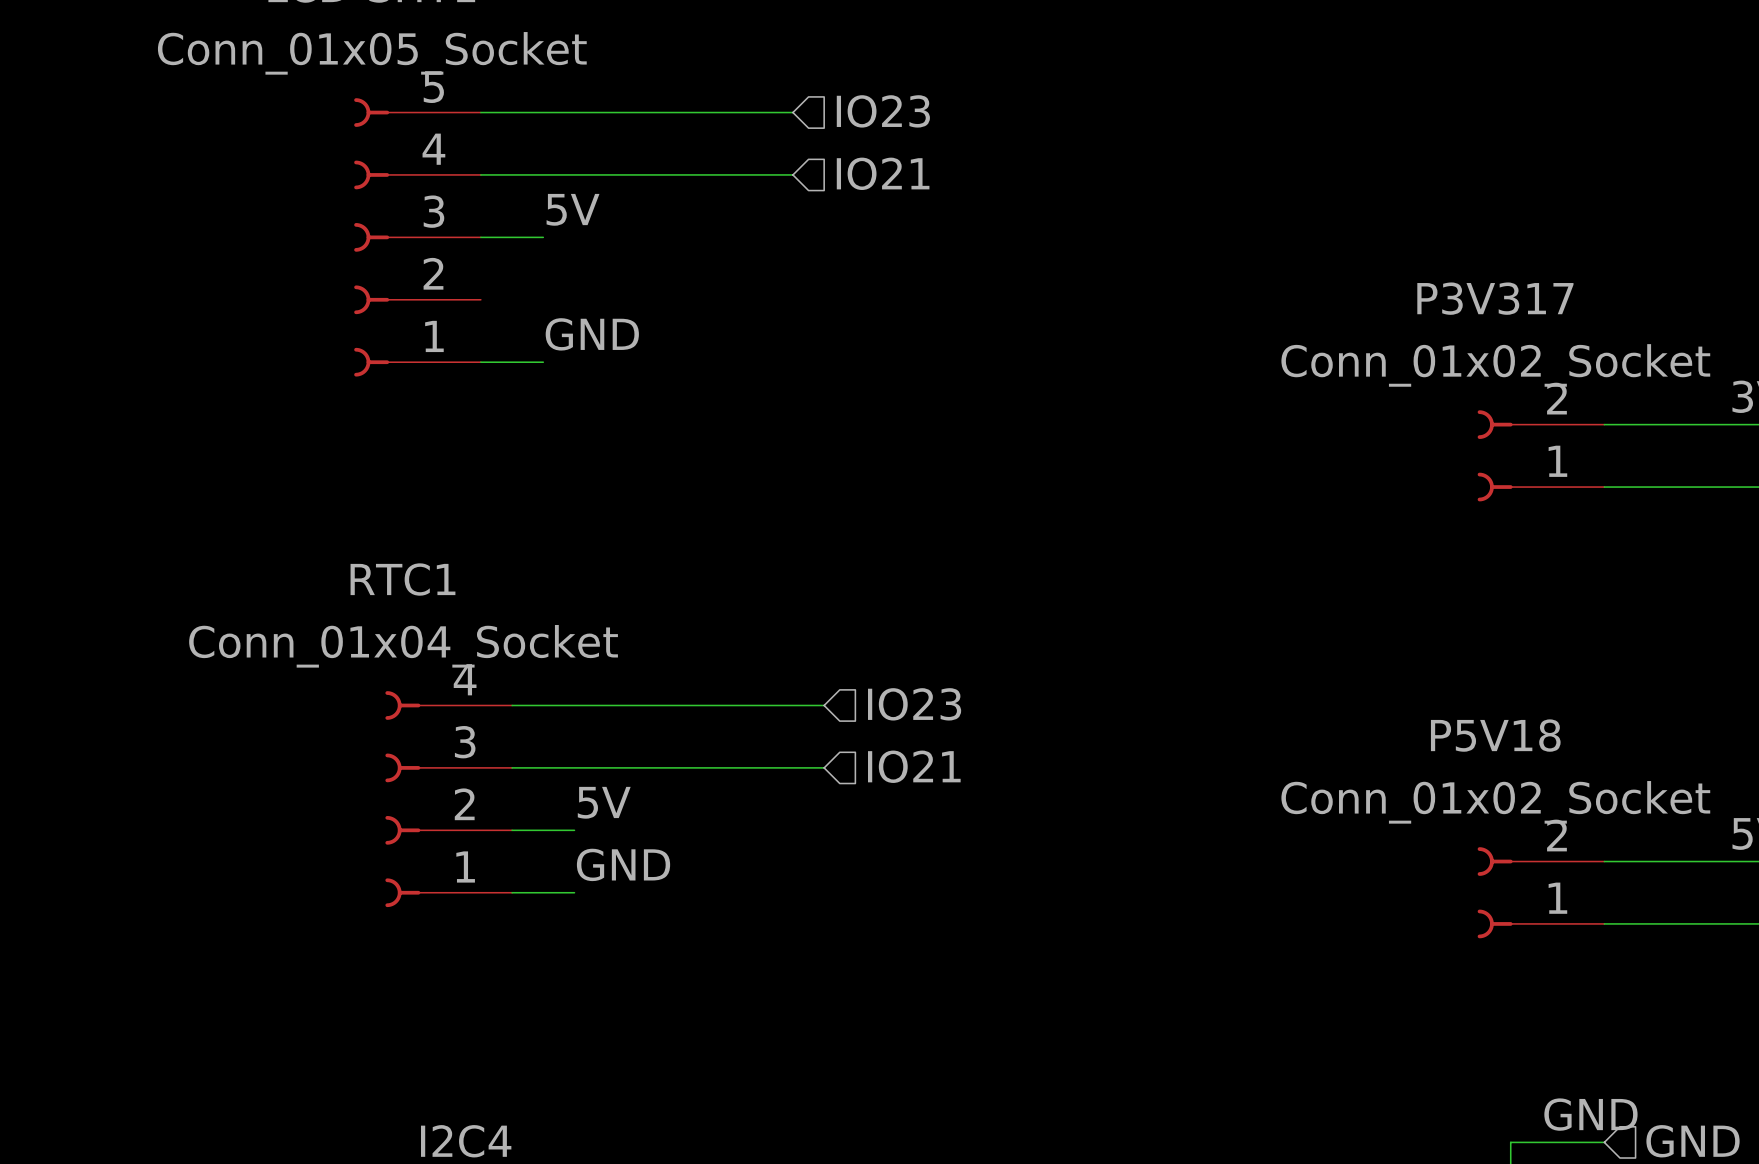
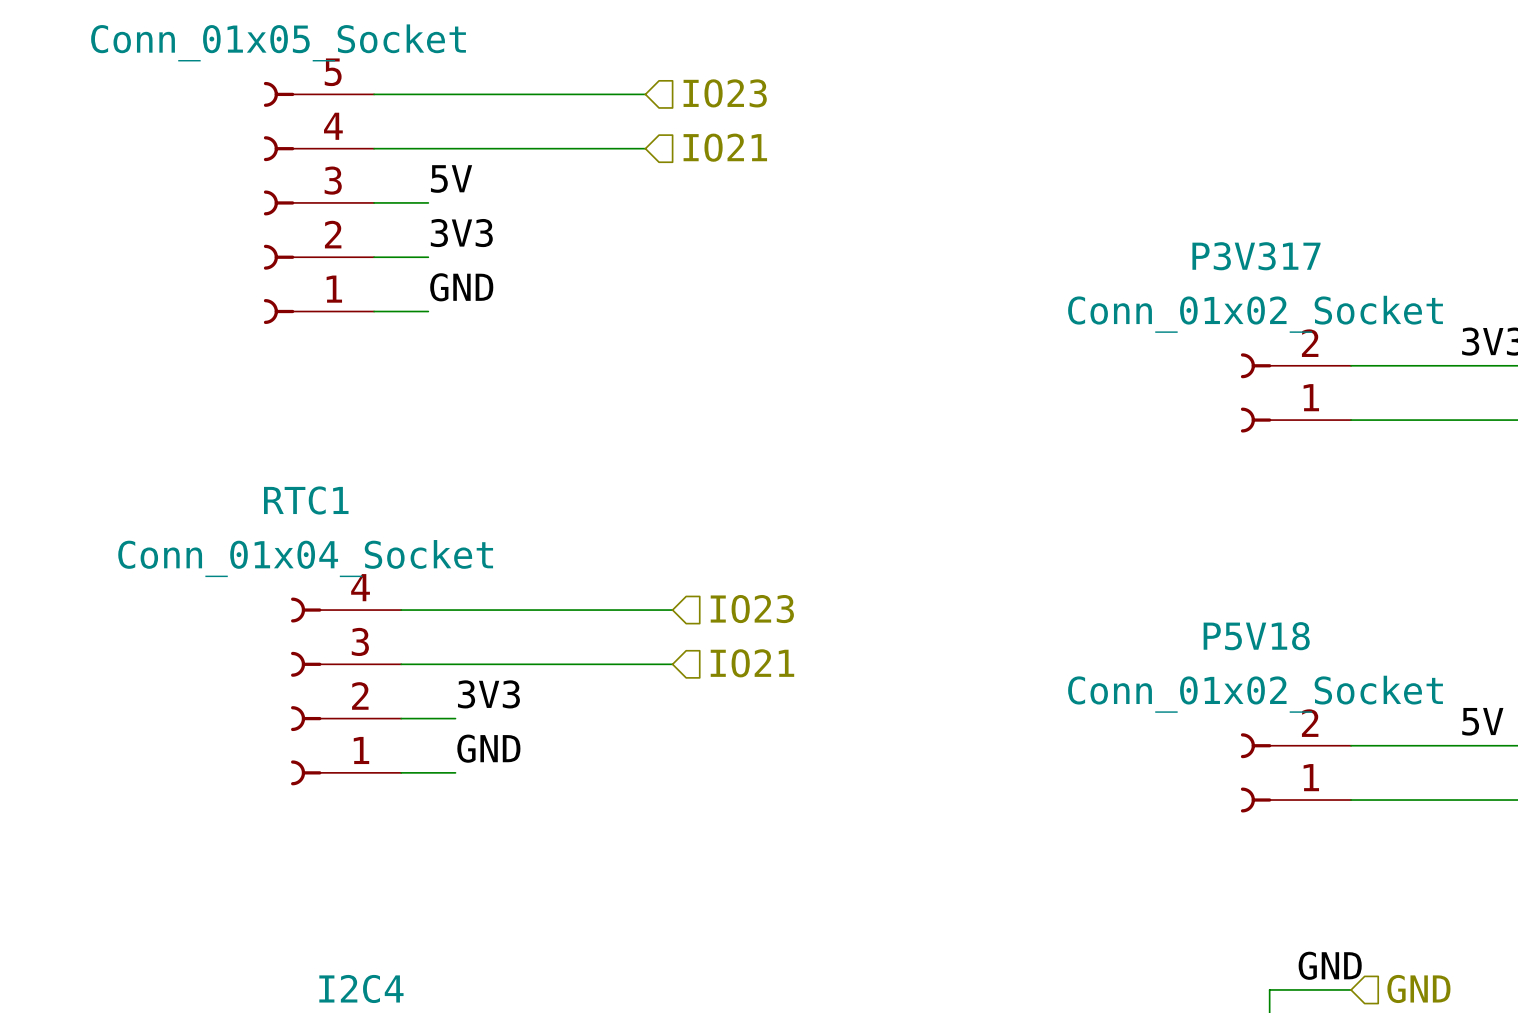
label: none -> 3V3 (461, 233)
wire: none -> (374, 257) (428, 257)
label: 5V (604, 802) -> 3V3 (488, 694)

